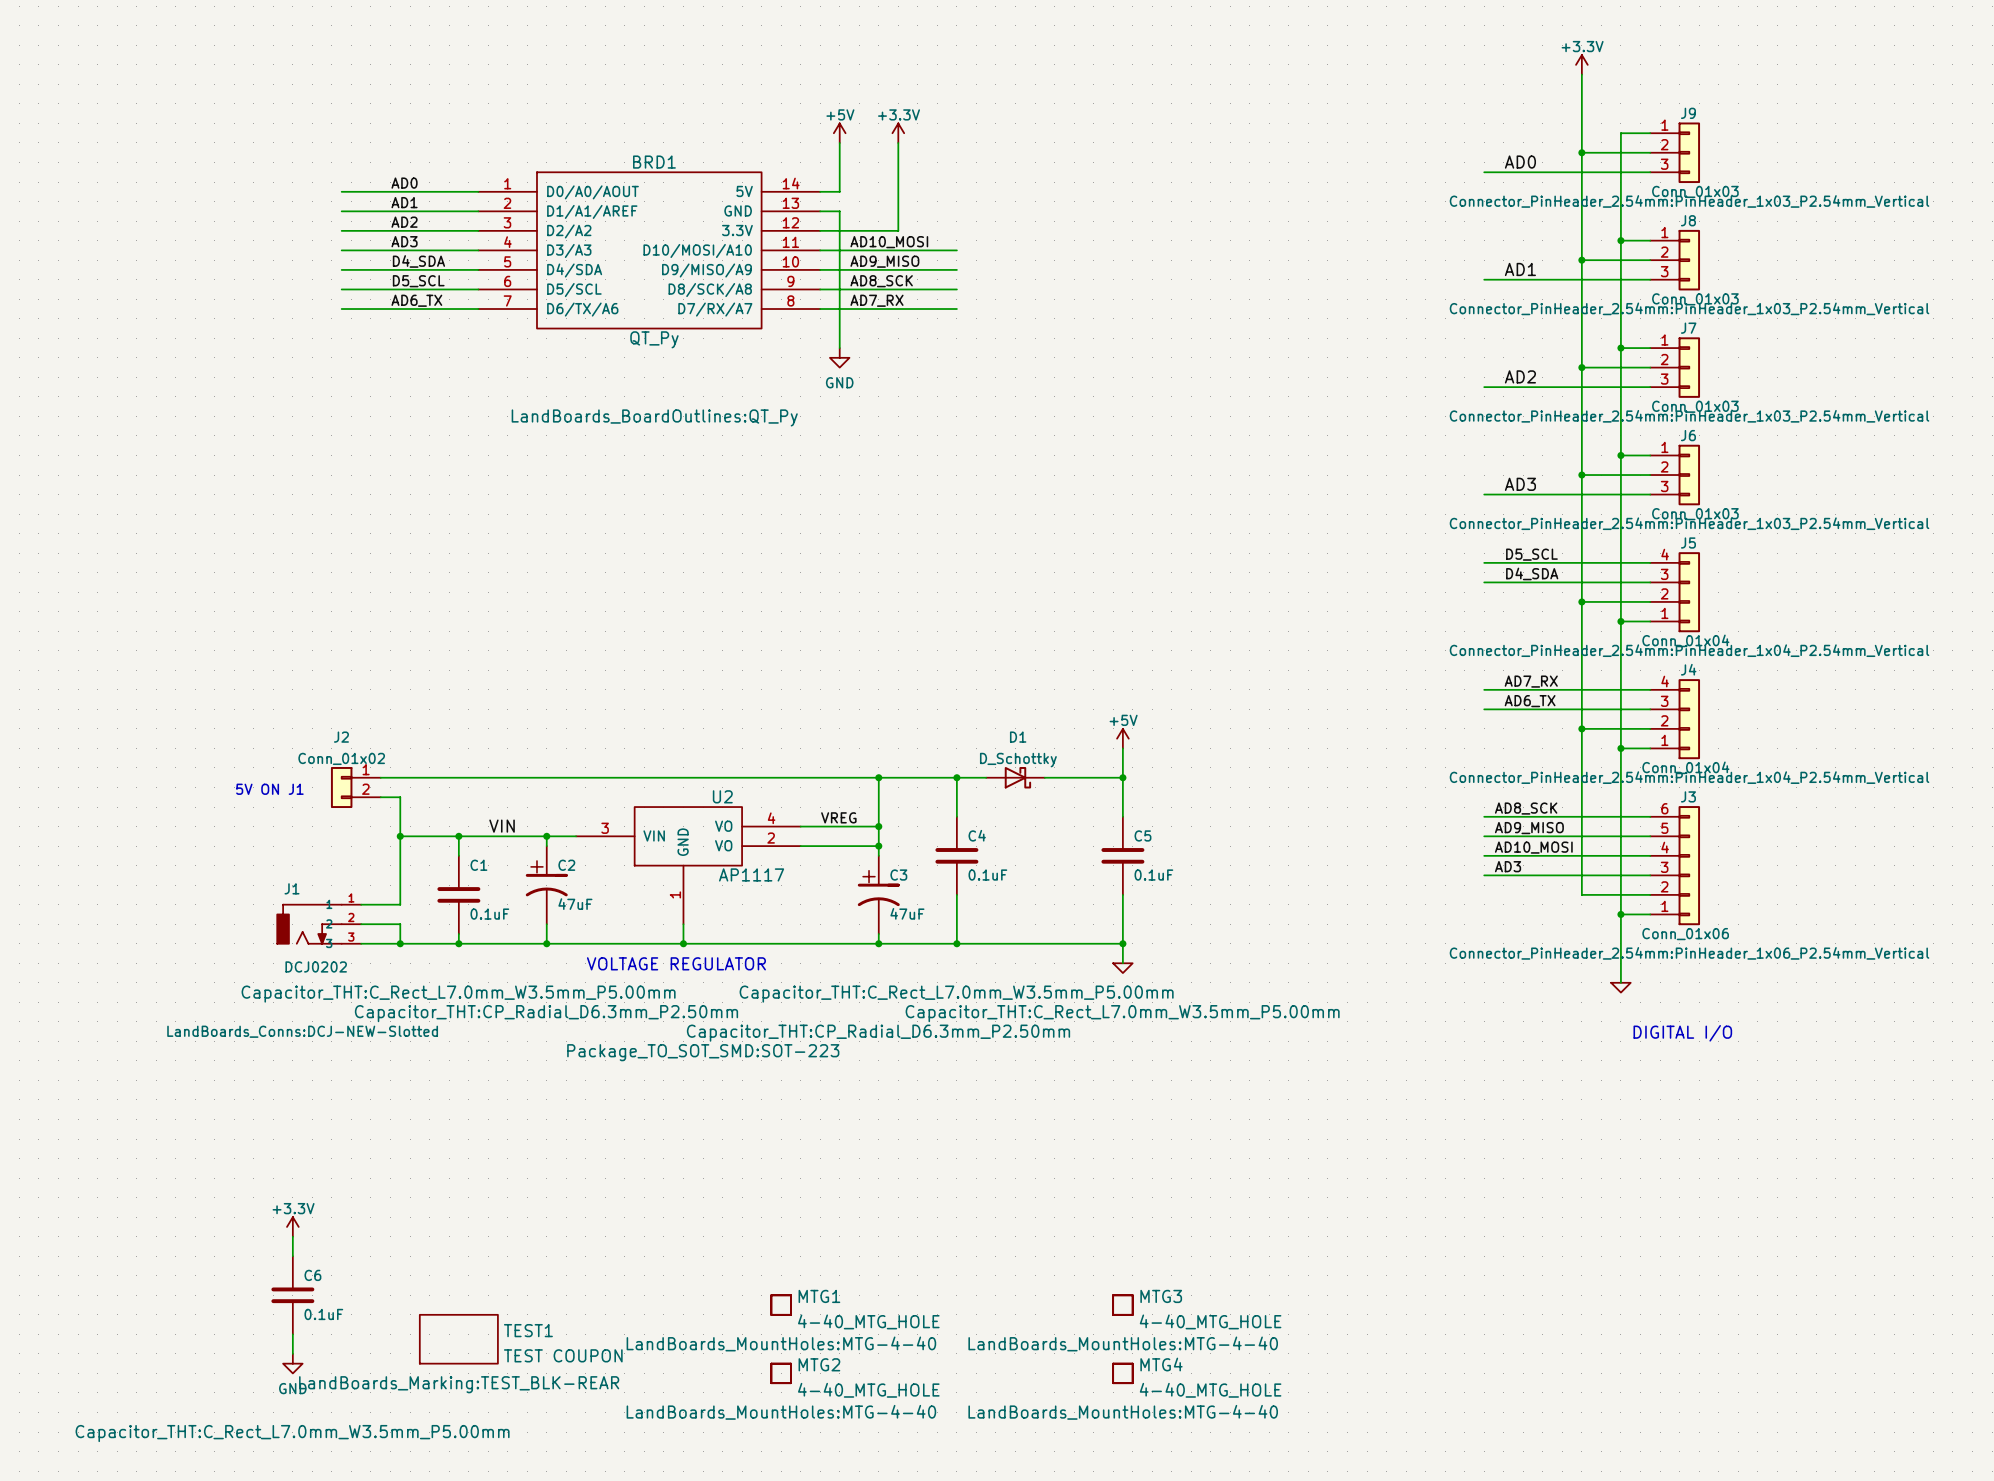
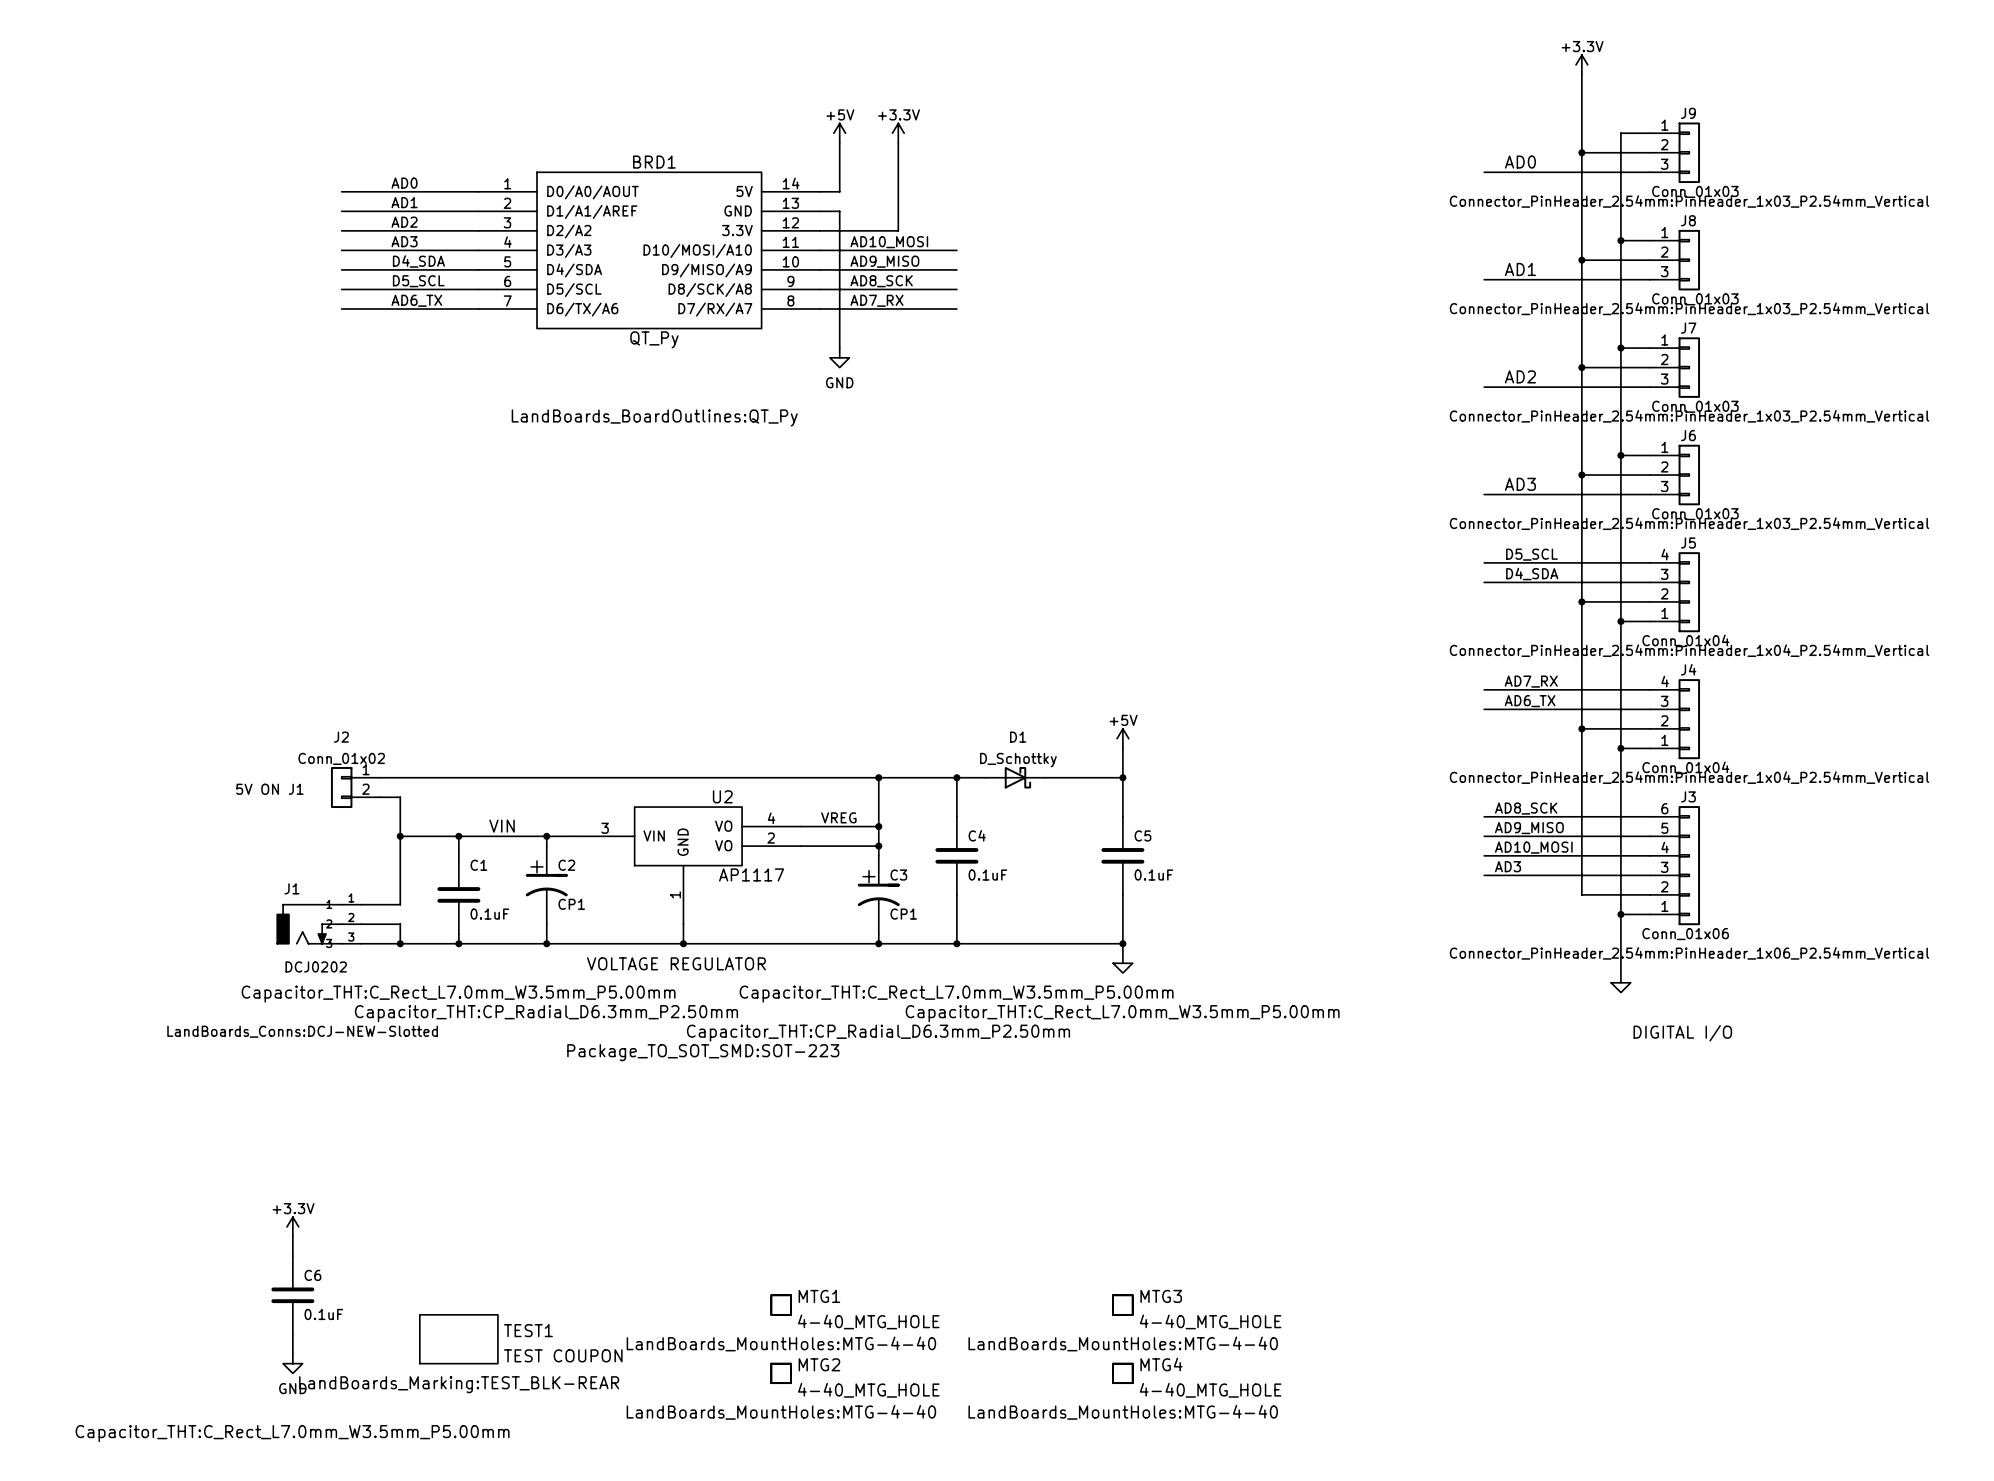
C2 value: 47uF (575, 904) -> CP1 (571, 904)
C3 value: 47uF (907, 913) -> CP1 (903, 914)

